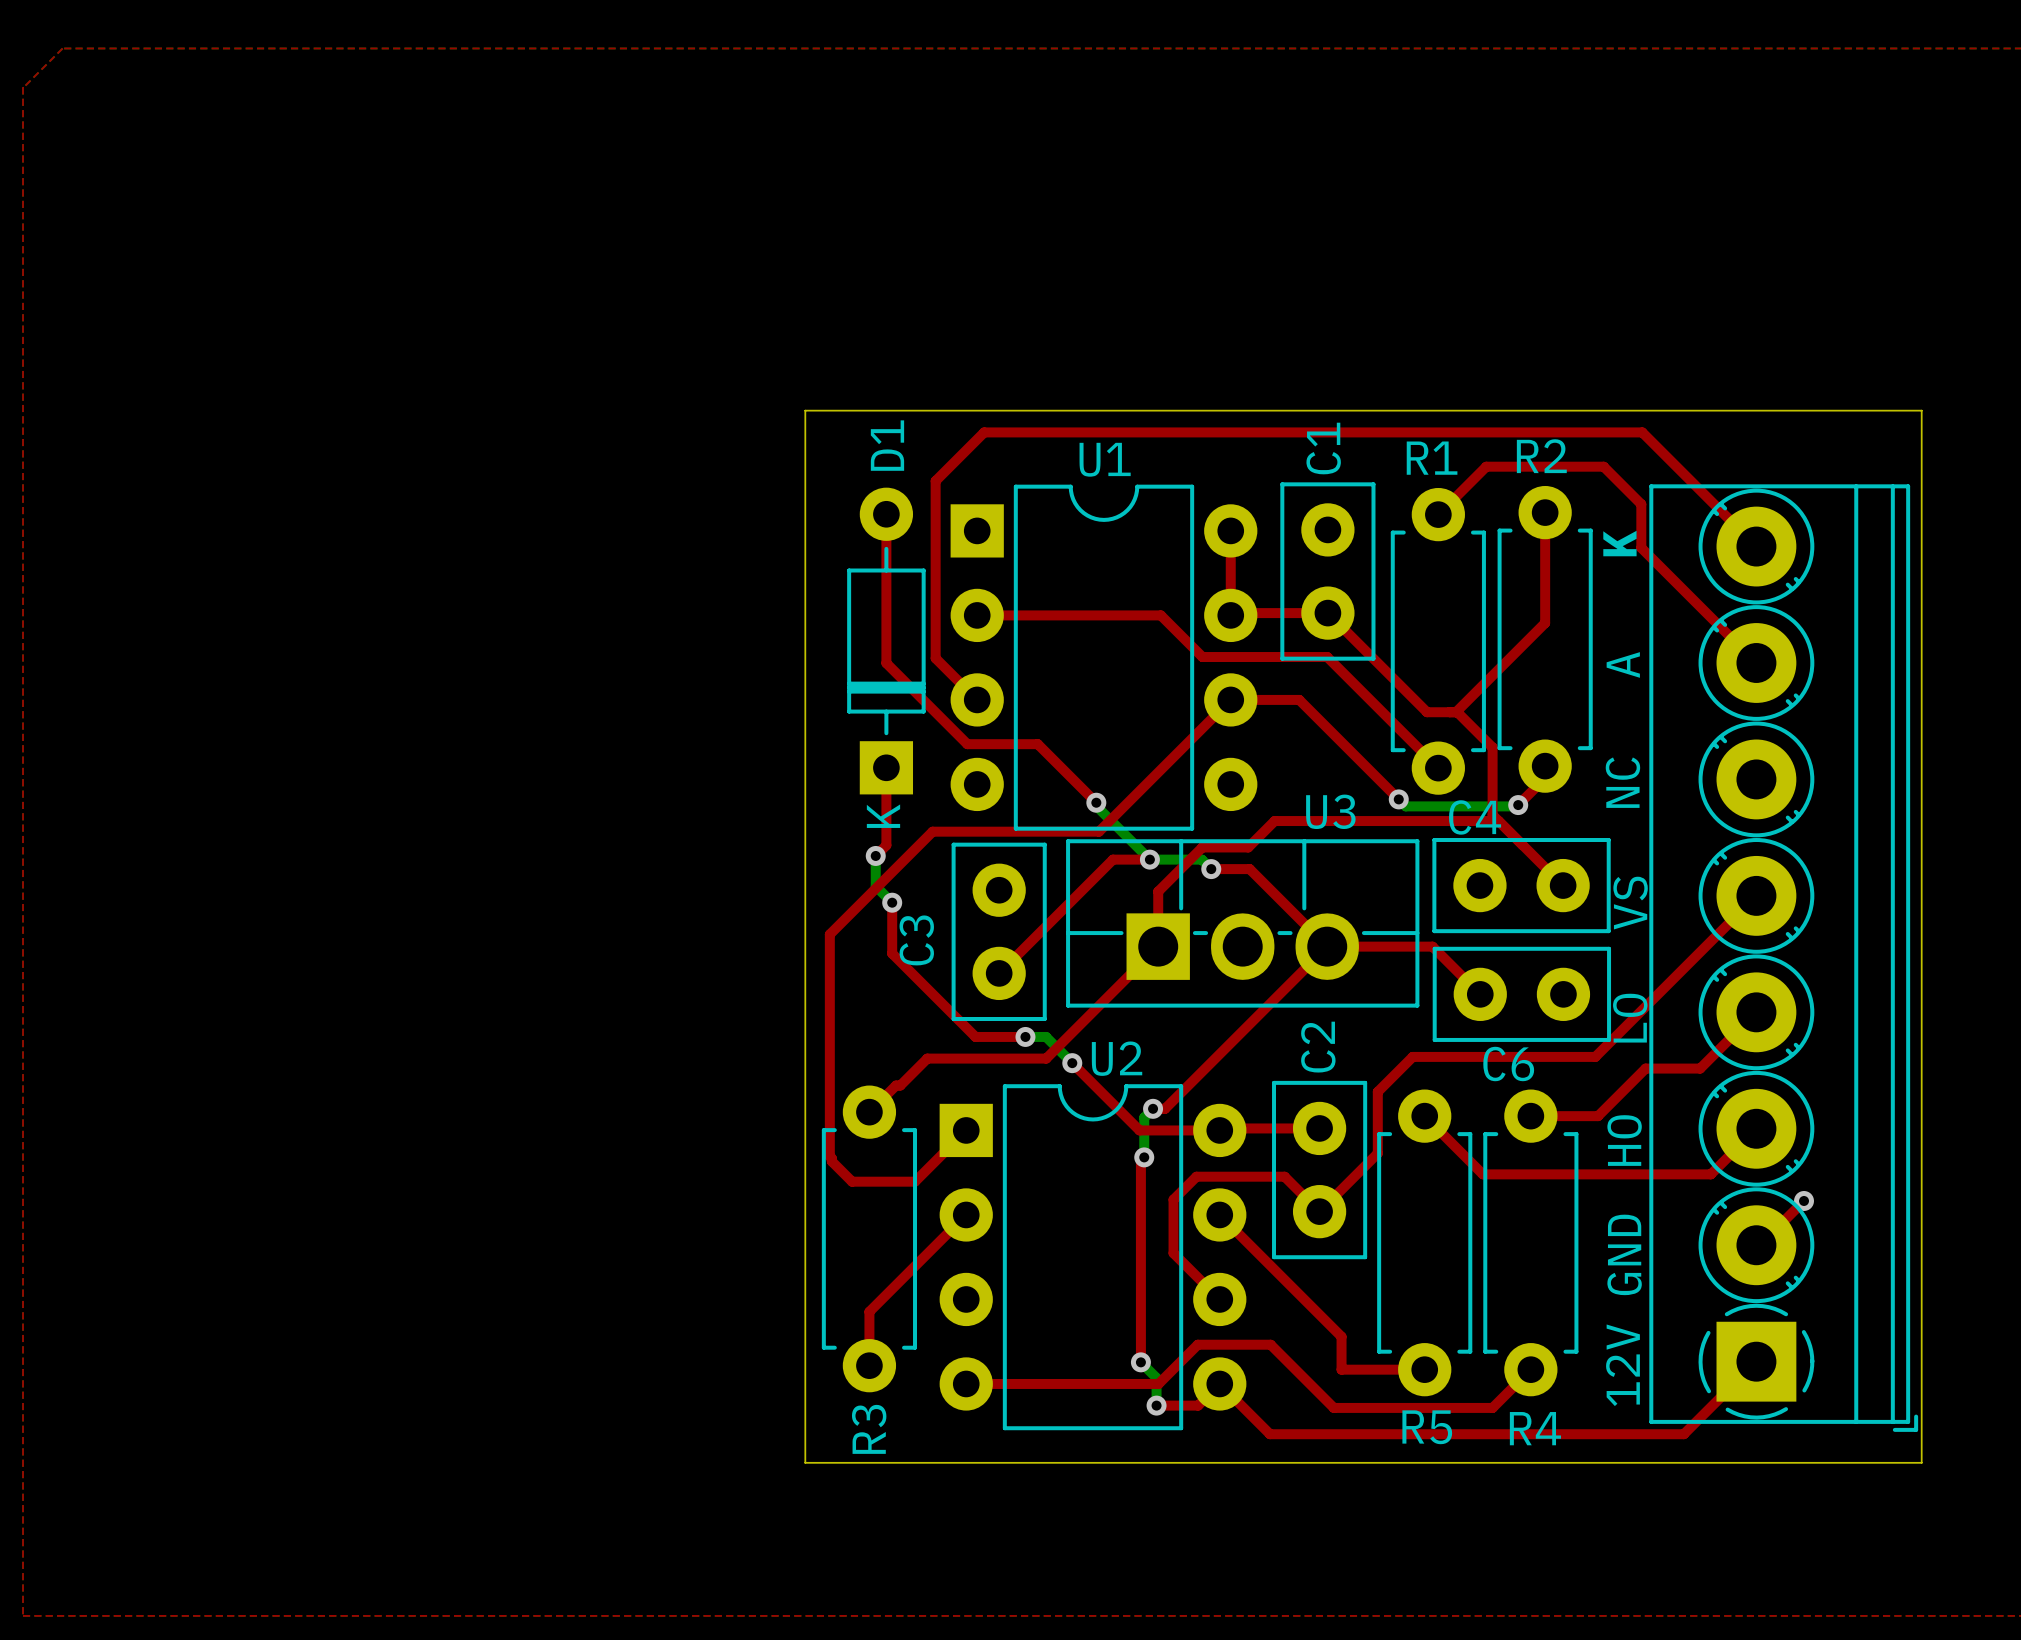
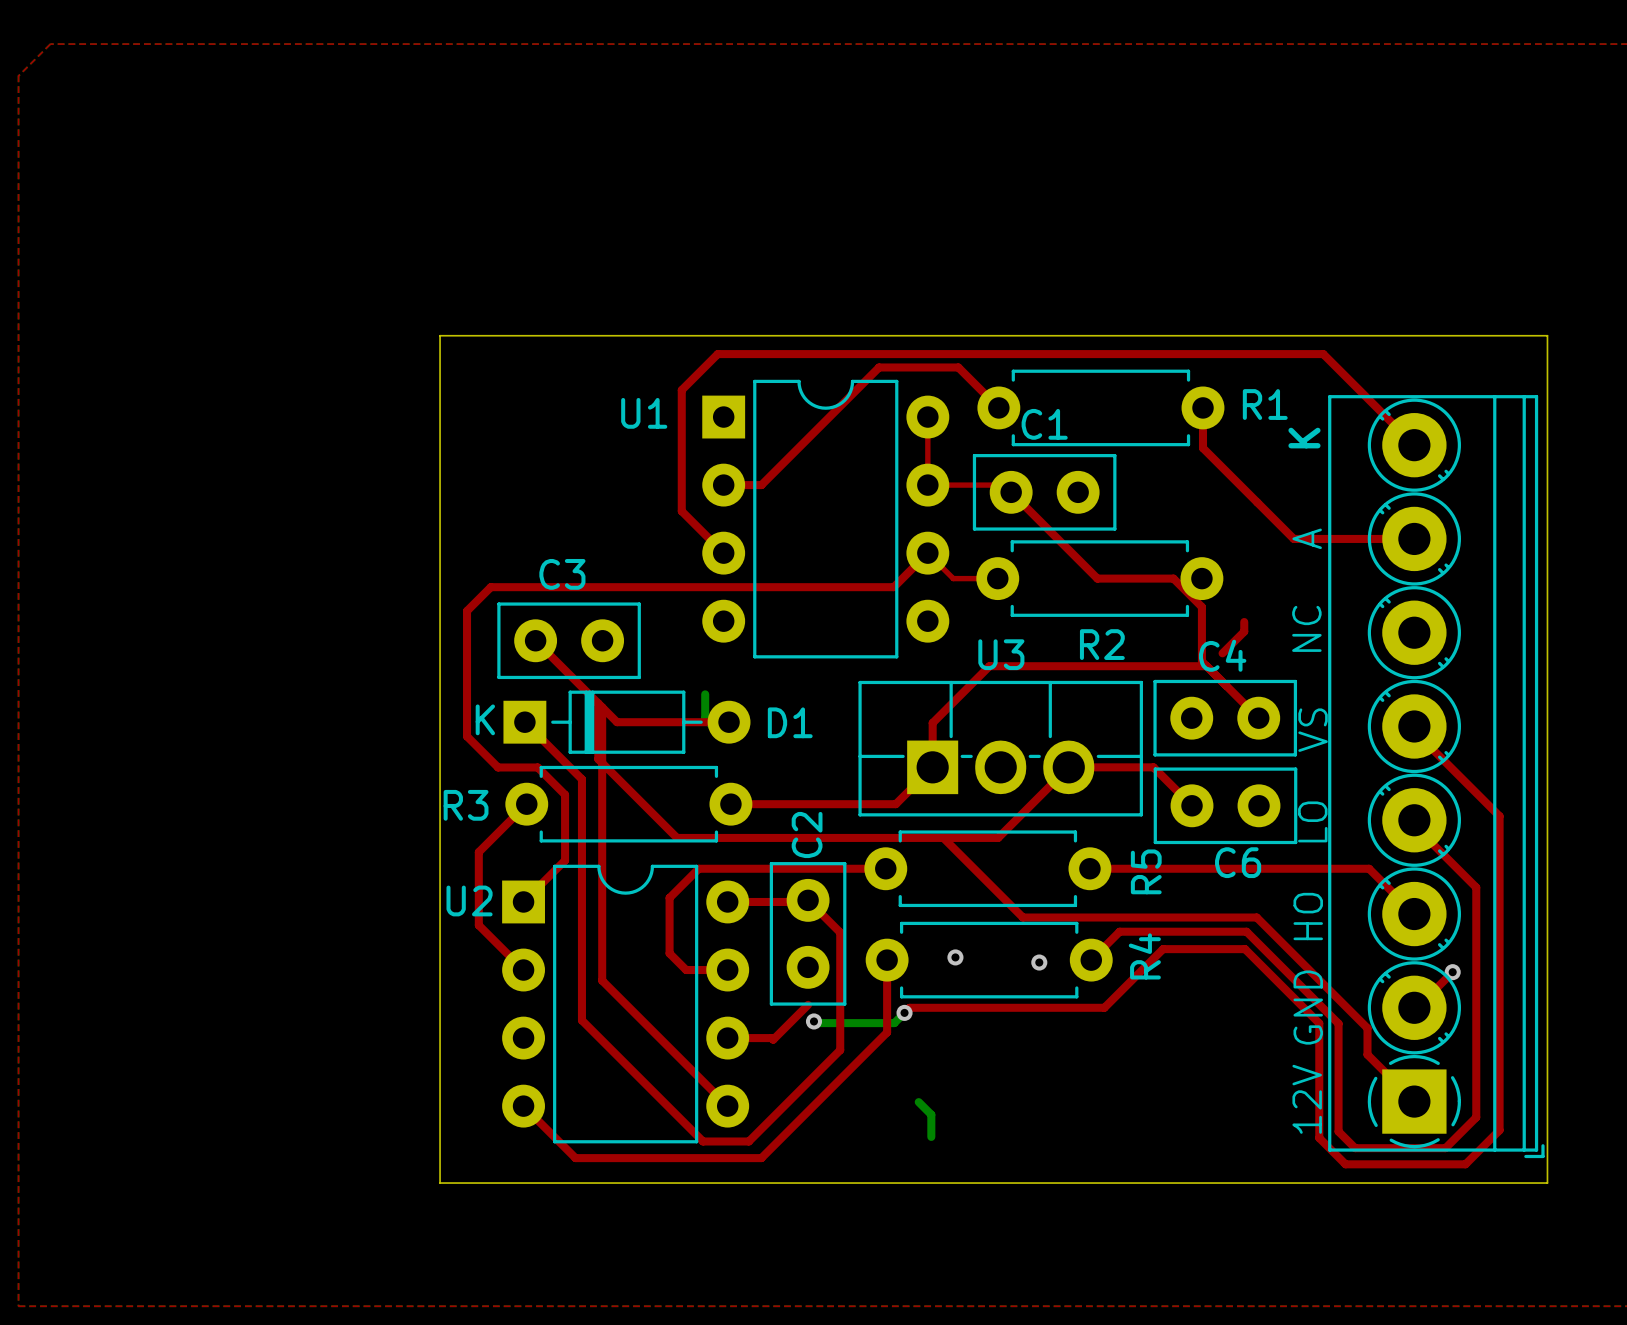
board edge: (805, 410) (805, 1462) -> (648, 335) (440, 335) (440, 1183) (648, 1183)
top track: (1643, 433) (984, 432) (935, 481) (935, 658) (977, 699) -> (1323, 354) (717, 354) (681, 390) (681, 511) (723, 553)
R2 name position: R2 (1541, 456) -> R2 (1102, 644)
U1 name position: U1 (1105, 459) -> U1 (644, 413)
top track: none -> (998, 407) (958, 367) (879, 367) (761, 485) (723, 485)
top track: (1545, 512) (1545, 623) (1455, 712) -> none
top track: (886, 514) (886, 663) (967, 744) (1037, 744) (1096, 802) -> none
top track: (1438, 514) (1486, 466) (1603, 466) (1641, 504) (1641, 547) (1756, 662) -> (1203, 407) (1203, 448) (1293, 538) (1414, 538)
top track: (1230, 530) (1230, 615) (1233, 613) (1327, 613) (1427, 712) -> (927, 417) (927, 485) (1003, 485) (1097, 578) (1149, 578)
C1 rotation: 0° (1327, 571) -> 90° clockwise (1044, 492)
top track: (977, 615) (1160, 615) (1202, 657) (1327, 657) (1438, 768) -> none
R2 rotation: 0° (1545, 639) -> 90° clockwise (1099, 578)
R2 position: (1545, 639) -> (1099, 578)
D1 rotation: 0° (886, 641) -> 90° clockwise (626, 722)
D1 position: (886, 641) -> (626, 722)
R1 rotation: 0° (1438, 641) -> 90° clockwise (1100, 407)
U1 position: (1103, 657) -> (825, 519)
top track: none -> (997, 578) (953, 578) (927, 553) (893, 587) (490, 587) (467, 611) (467, 736) (498, 767) (537, 767) (565, 794) (565, 860) (523, 901)
top track: (886, 767) (886, 845) (875, 855) -> none
top track: none -> (535, 640) (617, 722) (729, 722)
top track: (1398, 799) (1299, 699) (1230, 699) (1099, 831) (932, 831) (829, 934) (829, 1156) (831, 1161) (852, 1181) (915, 1181) (966, 1130) -> none
bottom track: (1398, 799) (1405, 806) (1518, 805) -> none
via: (1398, 799) -> none
bottom track: (1096, 802) (1096, 806) (1149, 859) (1201, 859) (1211, 869) -> none
via: (1096, 802) -> none
via: (1518, 805) -> none
U3 name position: U3 (1330, 811) -> U3 (1001, 654)
C4 name position: C4 (1475, 817) -> C4 (1222, 655)
top track: (1274, 821) (1248, 847) (1202, 847) -> (1026, 666) (989, 666) (968, 687)
via: (875, 855) -> none
top track: (1149, 859) (1112, 859) (999, 973) -> none
via: (1149, 859) -> none
top track: (1211, 869) (1249, 869) (1327, 946) -> none
via: (1211, 869) -> none
top track: none -> (602, 707) (602, 980) (727, 1106)
top track: none -> (524, 722) (581, 779) (581, 1020) (703, 1141) (748, 1141) (840, 1050) (840, 932) (808, 900) (806, 901) (727, 901)
top track: (1756, 895) (1595, 1056) (1412, 1056) (1377, 1091) (1377, 1153) (1319, 1211) (1284, 1176) (1196, 1176) (1173, 1199) (1173, 1253) (1219, 1299) -> none
top track: (892, 902) (892, 953) (975, 1036) (1025, 1036) -> none
via: (892, 902) -> none
top track: none -> (1425, 742) (1499, 816) (1499, 1130) (1465, 1164) (1345, 1164) (1319, 1138) (1319, 1023) (1245, 949) (1163, 949) (1104, 1007) (909, 1007) (904, 1012)
C3 rotation: 0° (999, 931) -> 90° clockwise (569, 640)
C3 position: (999, 931) -> (569, 640)
top track: none -> (526, 804) (478, 852) (478, 925) (523, 970)
top track: (1112, 992) (1046, 1058) (927, 1058) (869, 1112) -> (895, 804) (730, 804)
top track: (1756, 1012) (1700, 1068) (1645, 1068) (1598, 1116) (1530, 1116) -> (1414, 820) (1414, 825) (1476, 887) (1476, 1117) (1445, 1148) (1355, 1148) (1338, 1131) (1338, 1023) (1246, 931) (1119, 931) (1091, 960)
top track: (1239, 1034) (1165, 1108) (1153, 1108) -> (998, 837) (677, 837) (598, 759) (598, 703)
bottom track: (1025, 1036) (1046, 1036) (1072, 1063) -> none
via: (1025, 1036) -> none
U2 name position: U2 (1117, 1058) -> U2 (469, 900)
top track: (1072, 1063) (1139, 1130) (1319, 1128) -> none
via: (1072, 1063) -> none
C6 name position: C6 (1508, 1063) -> C6 (1238, 862)
top track: none -> (885, 868) (698, 868) (669, 897) (669, 953) (686, 970) (727, 970)
bottom track: (1153, 1108) (1144, 1117) (1144, 1157) -> none
via: (1153, 1108) -> none
top track: (1424, 1116) (1482, 1174) (1710, 1174) (1756, 1128) -> (1089, 868) (1369, 868) (1414, 914)
top track: (1144, 1157) (1140, 1160) (1140, 1362) -> none
via: (1144, 1157) -> none
C2 position: (1319, 1170) -> (808, 933)
via: none -> (955, 957)
top track: none -> (887, 960) (887, 1032) (761, 1158) (575, 1158) (523, 1106)
via: none -> (1039, 962)
top track: (966, 1214) (869, 1311) (869, 1365) -> none
top track: (1219, 1214) (1341, 1336) (1341, 1369) (1424, 1369) -> none
R3 rotation: 0° (869, 1238) -> 90° clockwise (628, 804)
R3 position: (869, 1238) -> (628, 804)
top track: none -> (808, 1004) (773, 1039) (771, 1038) (727, 1038)
R5 rotation: 0° (1424, 1242) -> 90° clockwise (987, 868)
R5 position: (1424, 1242) -> (987, 868)
R4 rotation: 0° (1530, 1242) -> 90° clockwise (989, 960)
R4 position: (1530, 1242) -> (989, 960)
bottom track: none -> (904, 1012) (894, 1023) (815, 1023) (813, 1021)
via: none -> (904, 1012)
U2 position: (1093, 1257) -> (625, 1004)
via: none -> (813, 1021)
top track: (1756, 1361) (1683, 1434) (1270, 1434) (1219, 1383) (1198, 1405) (1156, 1405) -> (1414, 1101) (1367, 1054) (1367, 1028) (1256, 917) (1022, 917) (943, 837)
via: (1140, 1362) -> none
top track: (1530, 1369) (1492, 1407) (1333, 1407) (1270, 1344) (1197, 1344) (1158, 1383) (966, 1383) -> none
via: (1156, 1405) -> none
R5 name position: R5 (1427, 1427) -> R5 (1146, 871)
R4 name position: R4 (1535, 1428) -> R4 (1144, 956)

